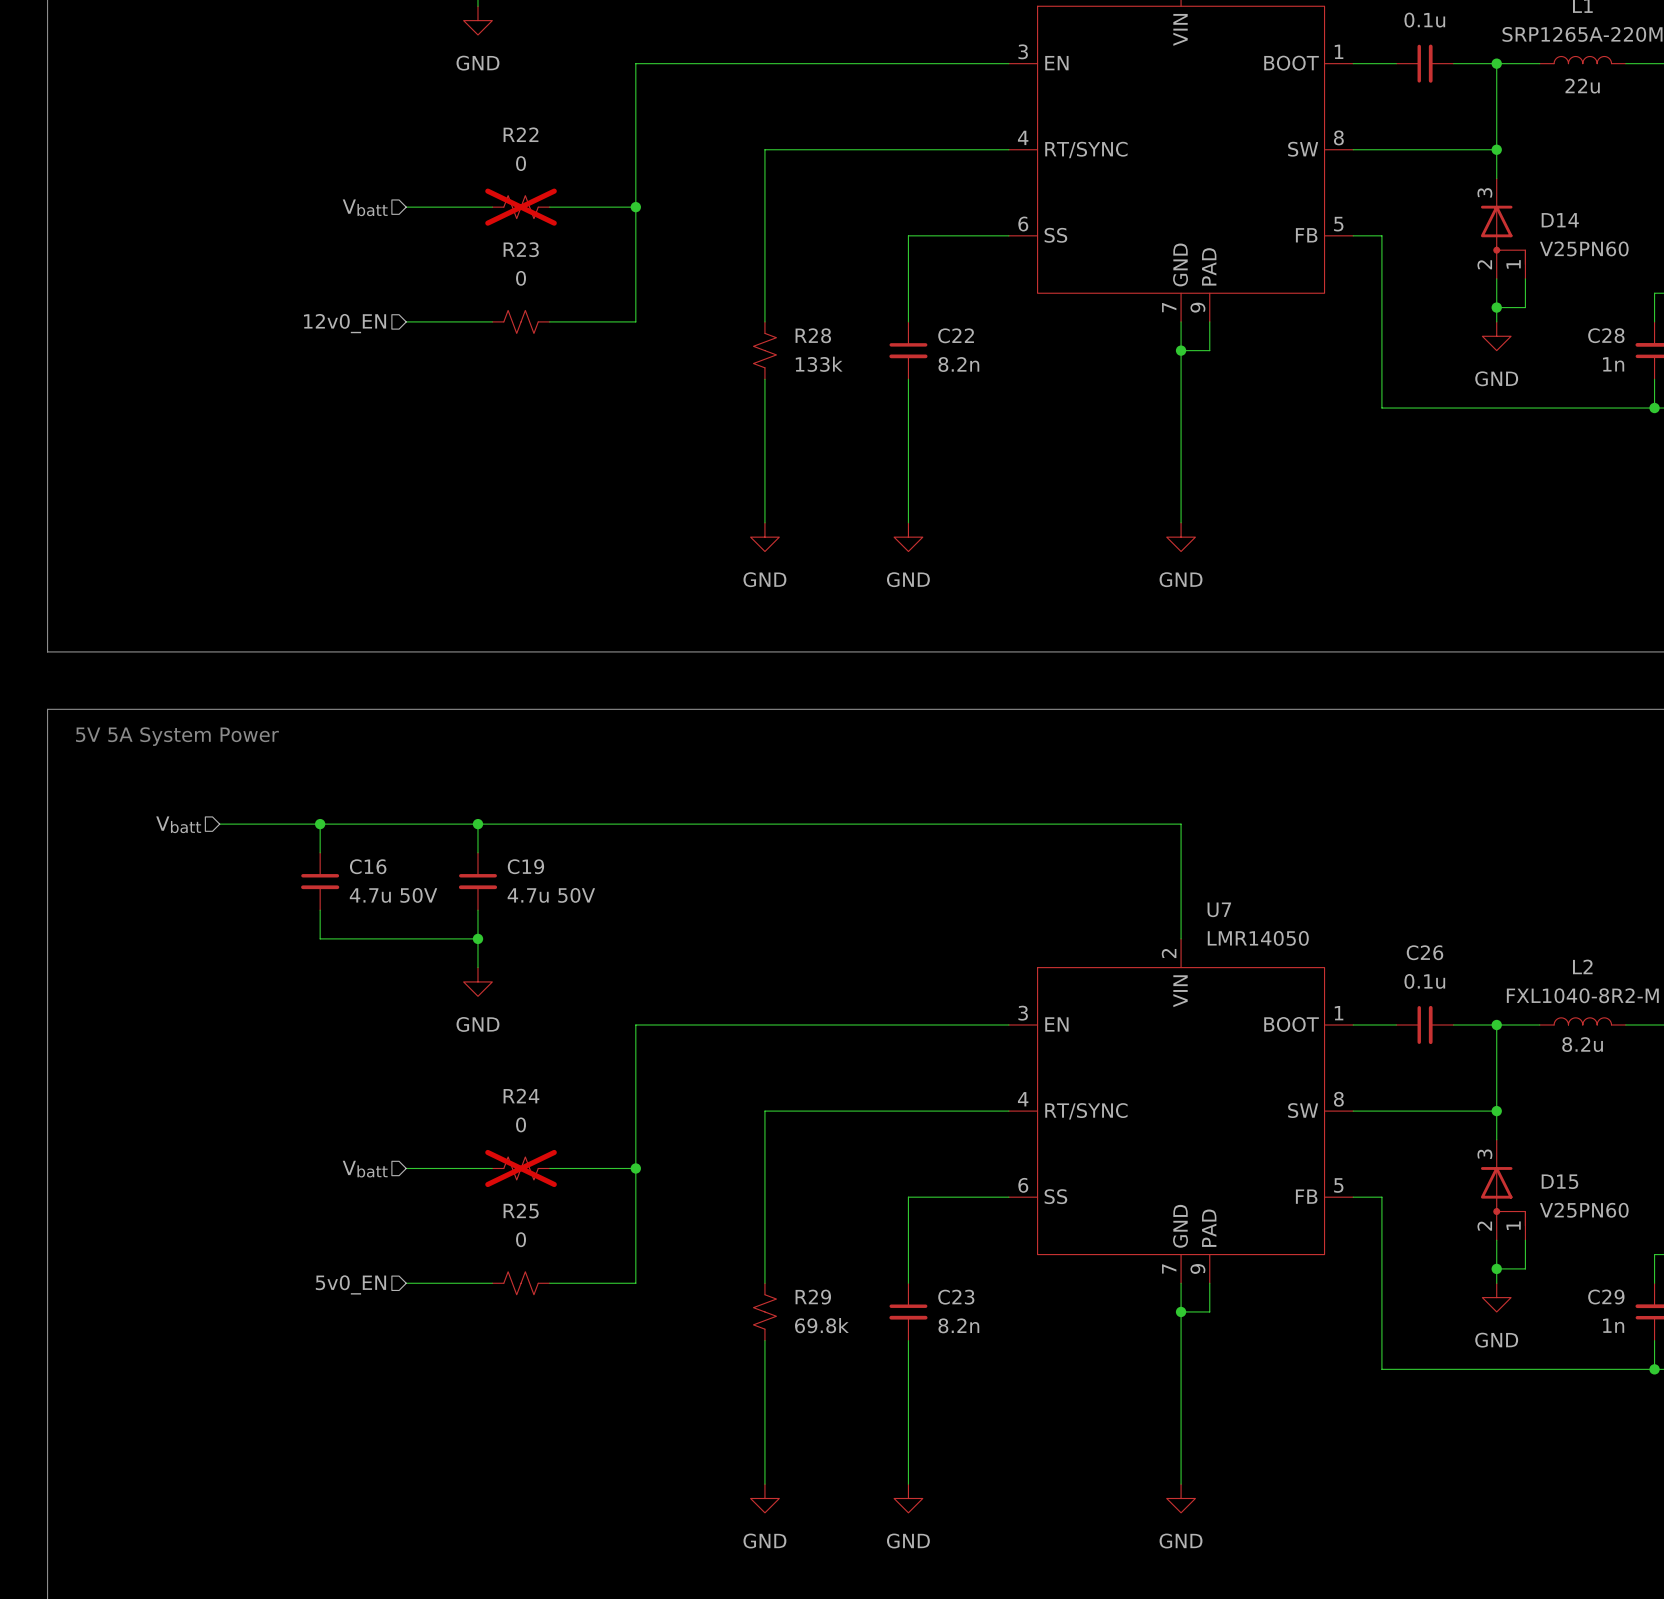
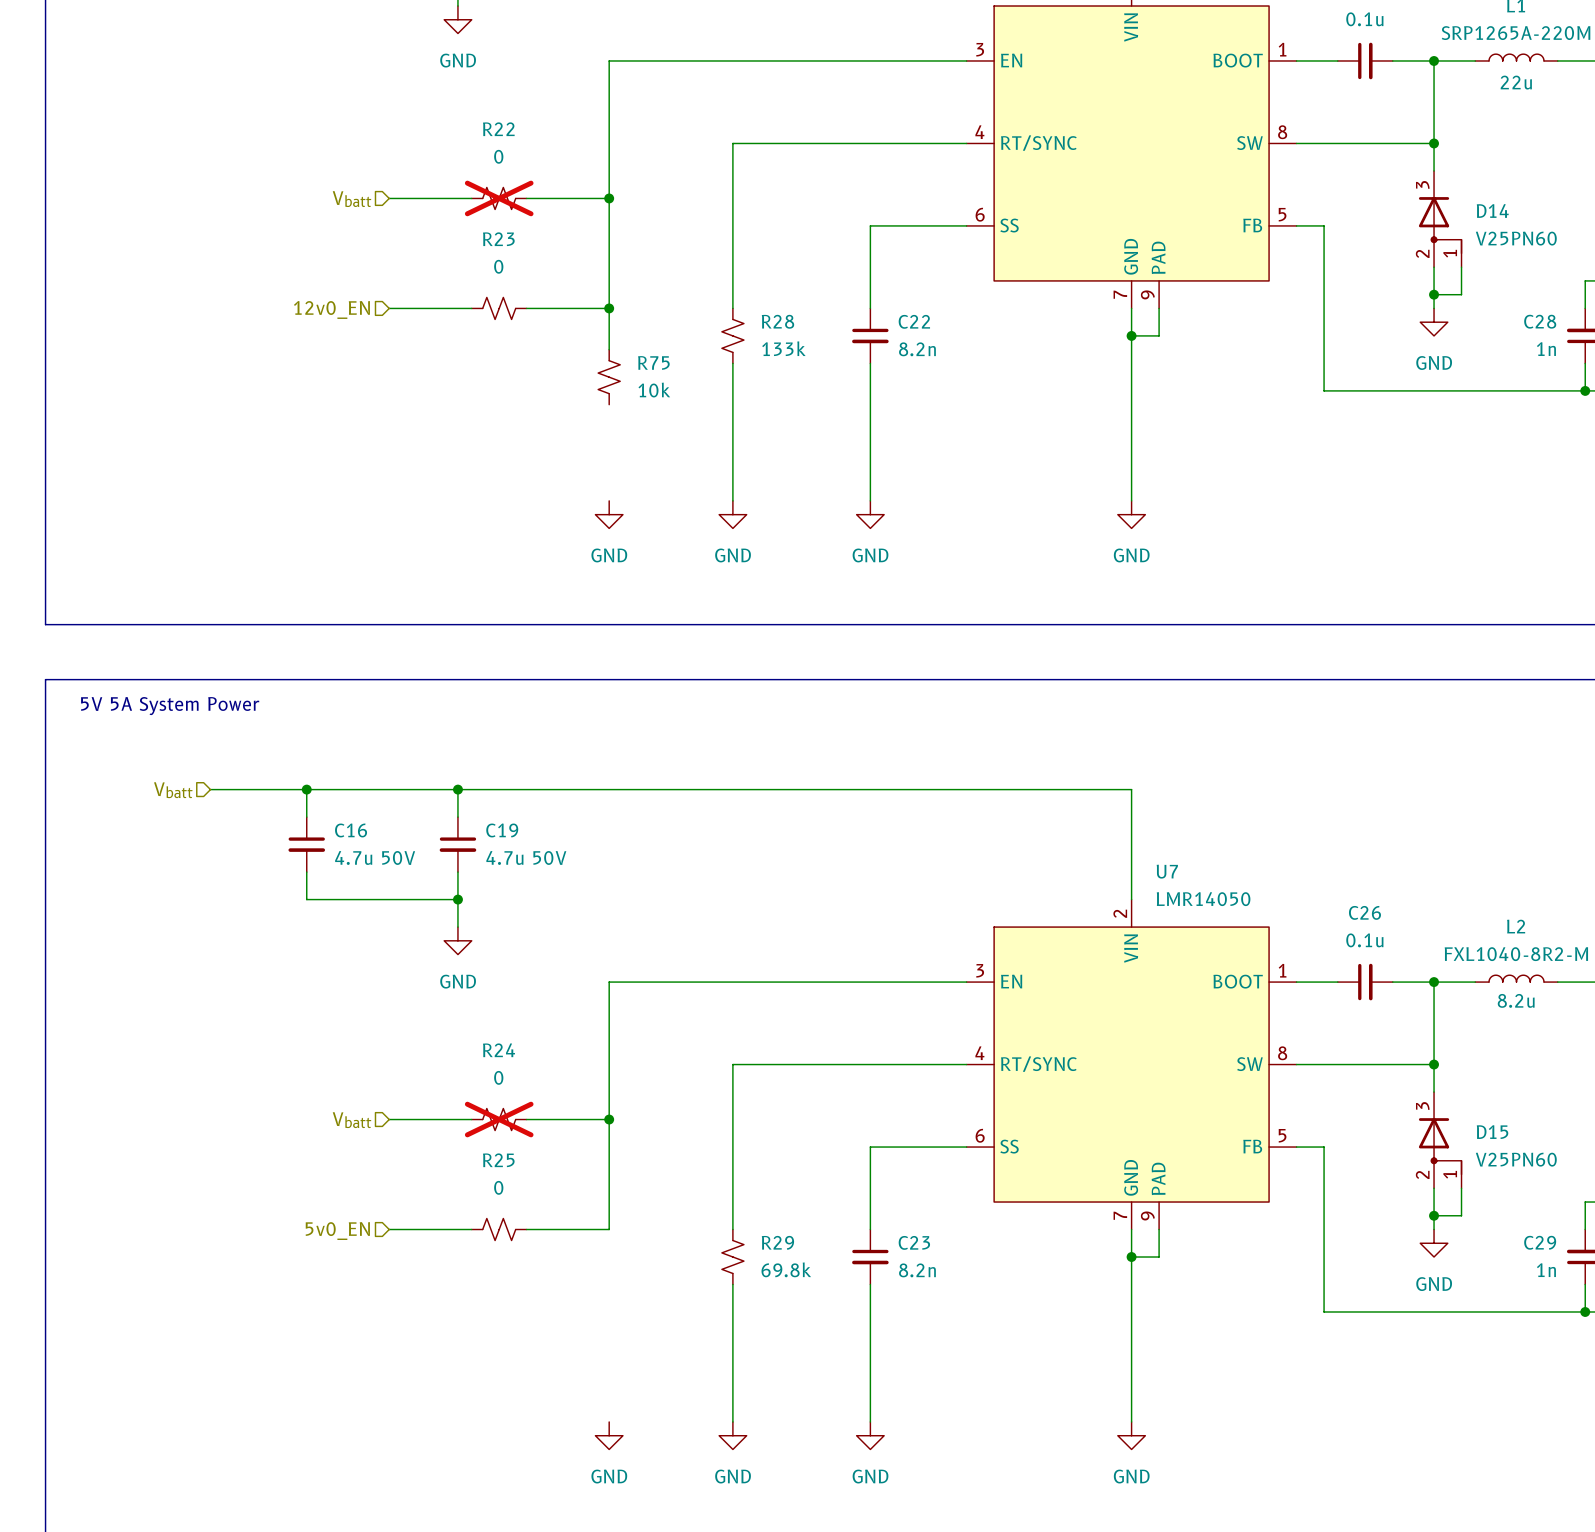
wire: none -> (609, 308) (609, 349)
junction: none -> (609, 308)
R75: none -> 10k (609, 377)
power symbol: none -> GND (609, 514)
power symbol: none -> GND (609, 1435)

